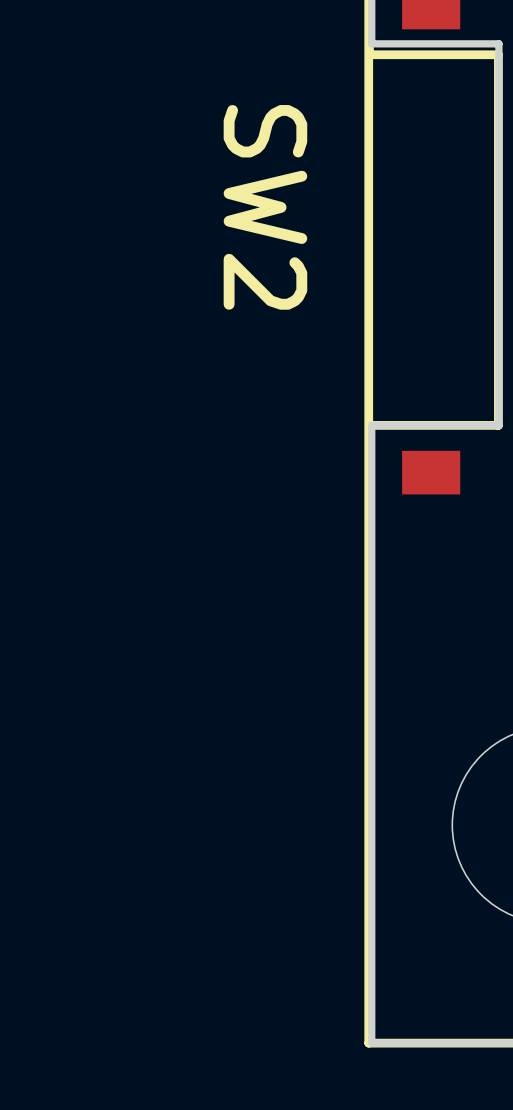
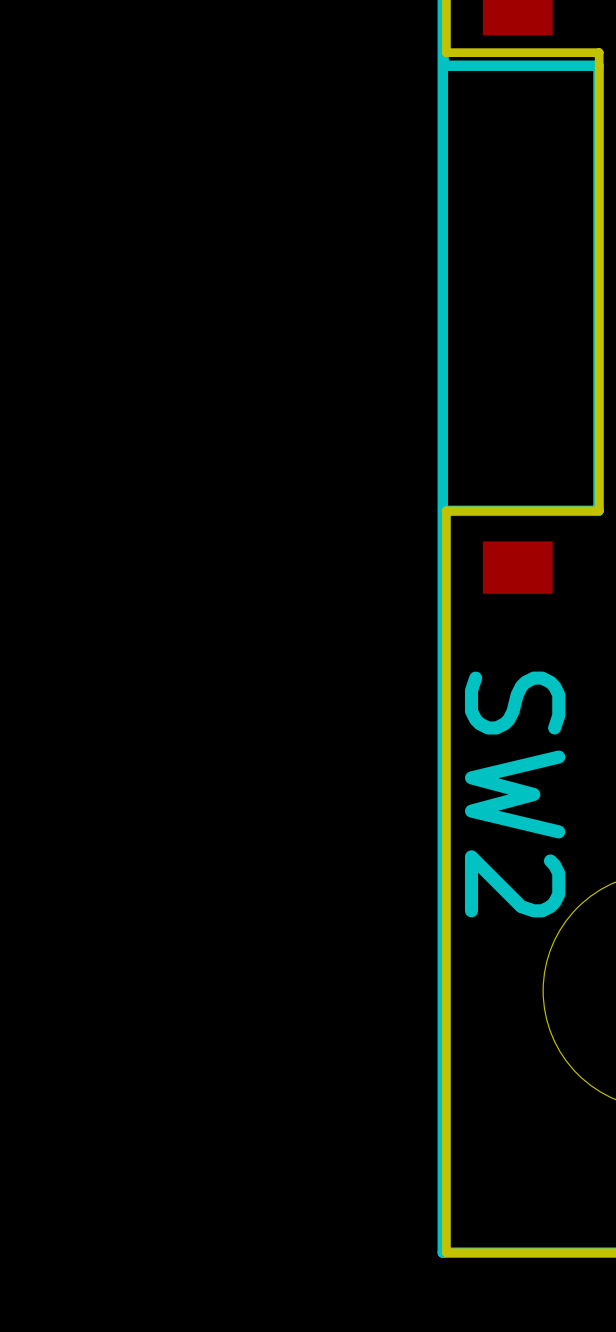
SW2 name position: SW2 (265, 207) -> SW2 (515, 794)

